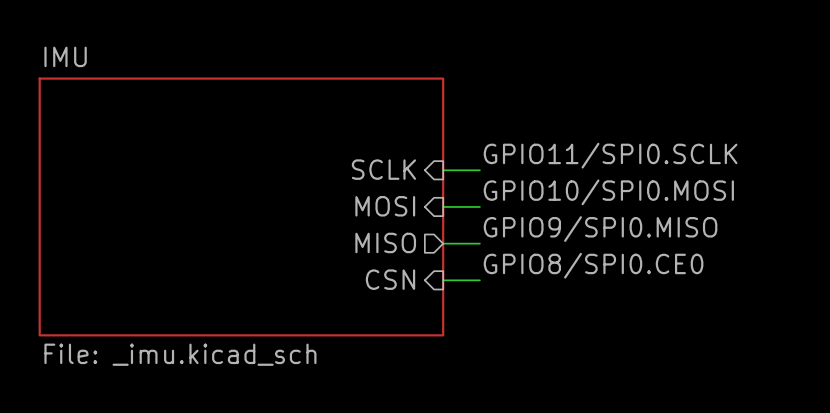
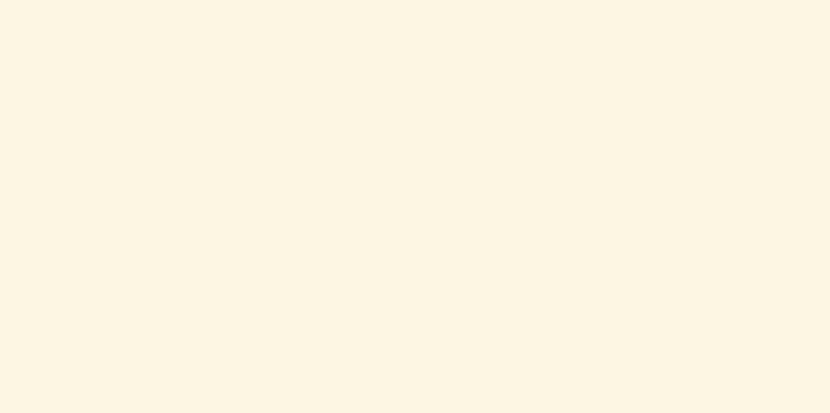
label: GPIO11/SPI0.SCLK (610, 155) -> none
sheet pin: SCLK (383, 169) -> none
wire: (443, 170) (479, 170) -> none
label: GPIO10/SPI0.MOSI (608, 192) -> none
sheet IMU: File: _imu.kicad_sch (241, 206) -> none
sheet pin: MOSI (385, 206) -> none
wire: (443, 206) (479, 206) -> none
label: GPIO9/SPI0.MISO (600, 229) -> none
sheet pin: MISO (385, 242) -> none
wire: (443, 243) (479, 243) -> none
label: GPIO8/SPI0.CE0 (593, 265) -> none
sheet pin: CSN (390, 279) -> none
wire: (443, 280) (479, 280) -> none

